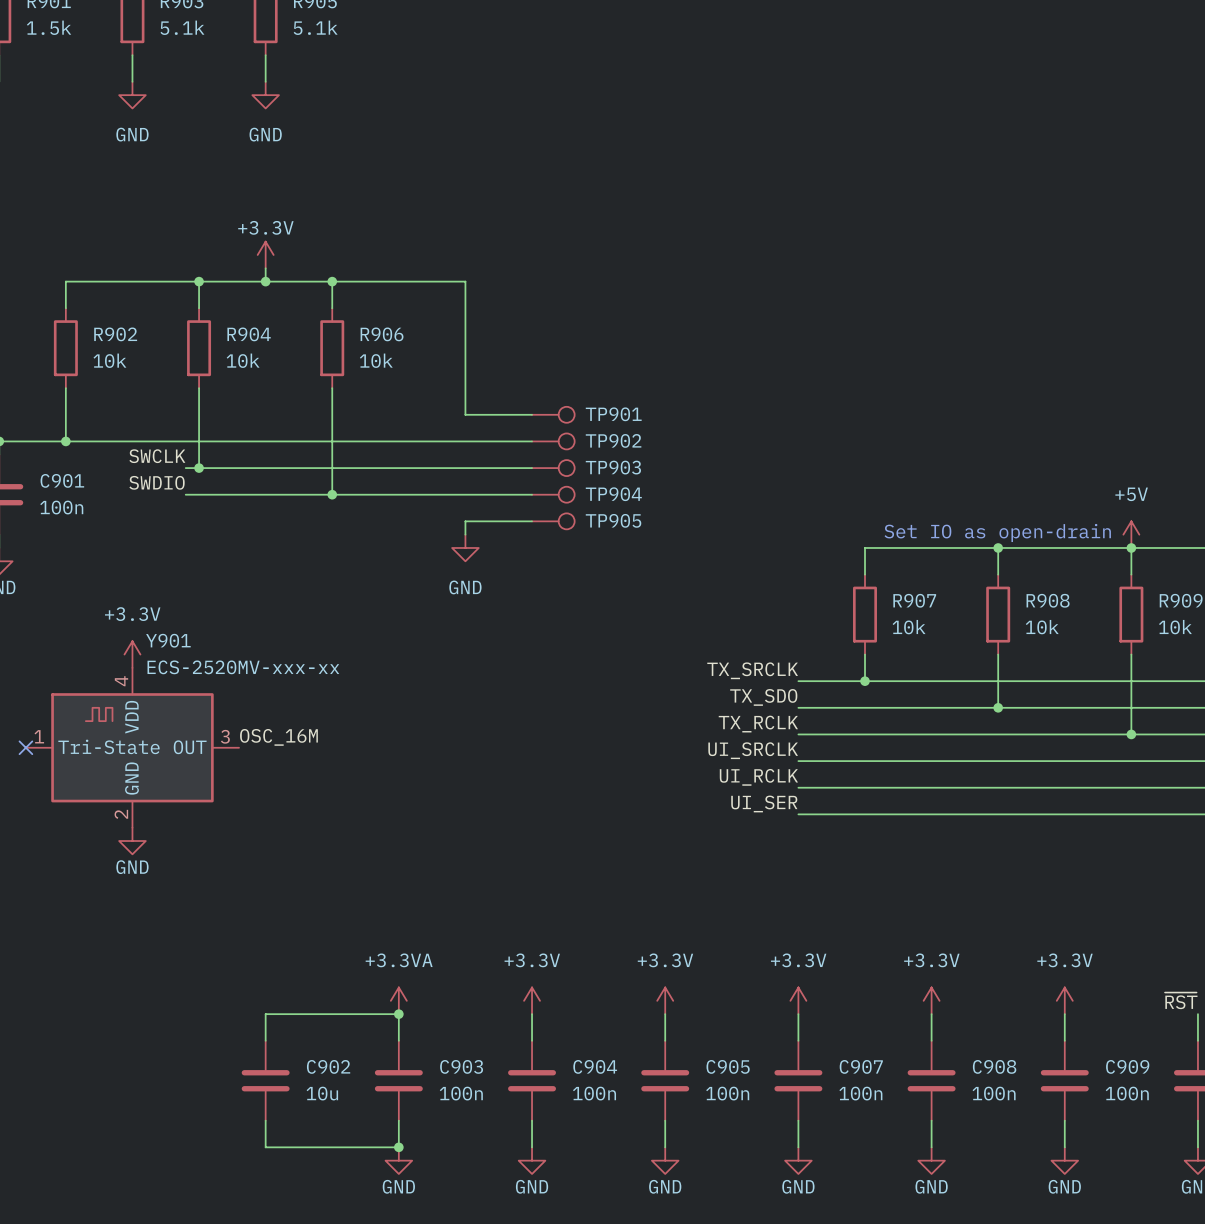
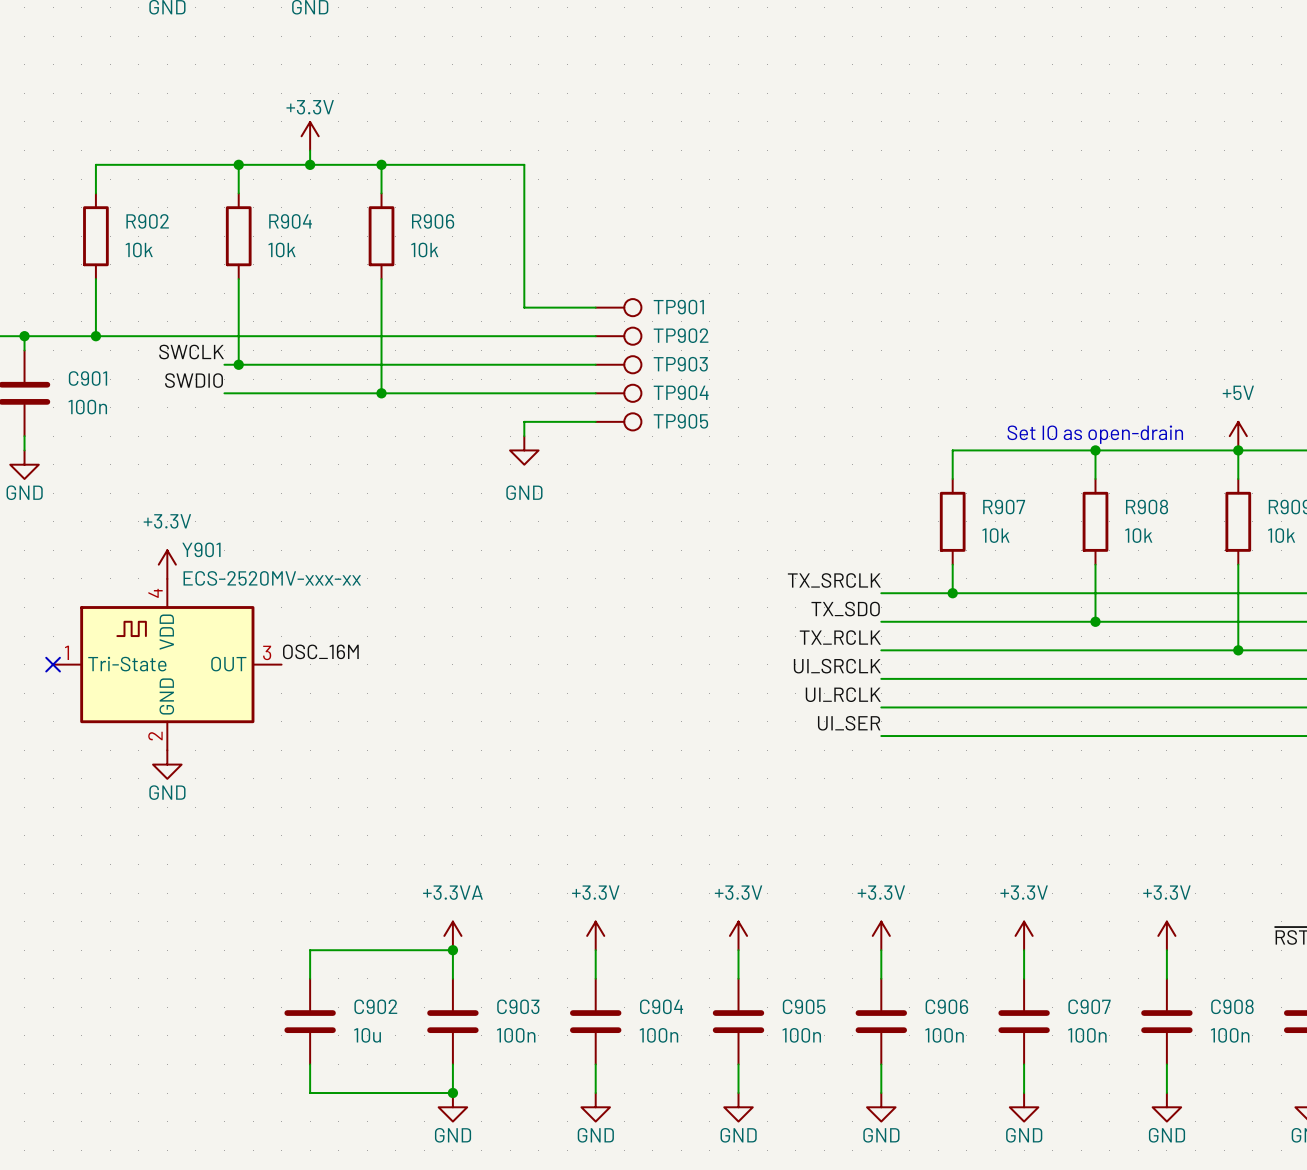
C907 name: C907 (861, 1066) -> C906 (946, 1006)
C908 name: C908 (994, 1066) -> C907 (1089, 1006)
C909 name: C909 (1127, 1066) -> C908 (1232, 1006)

